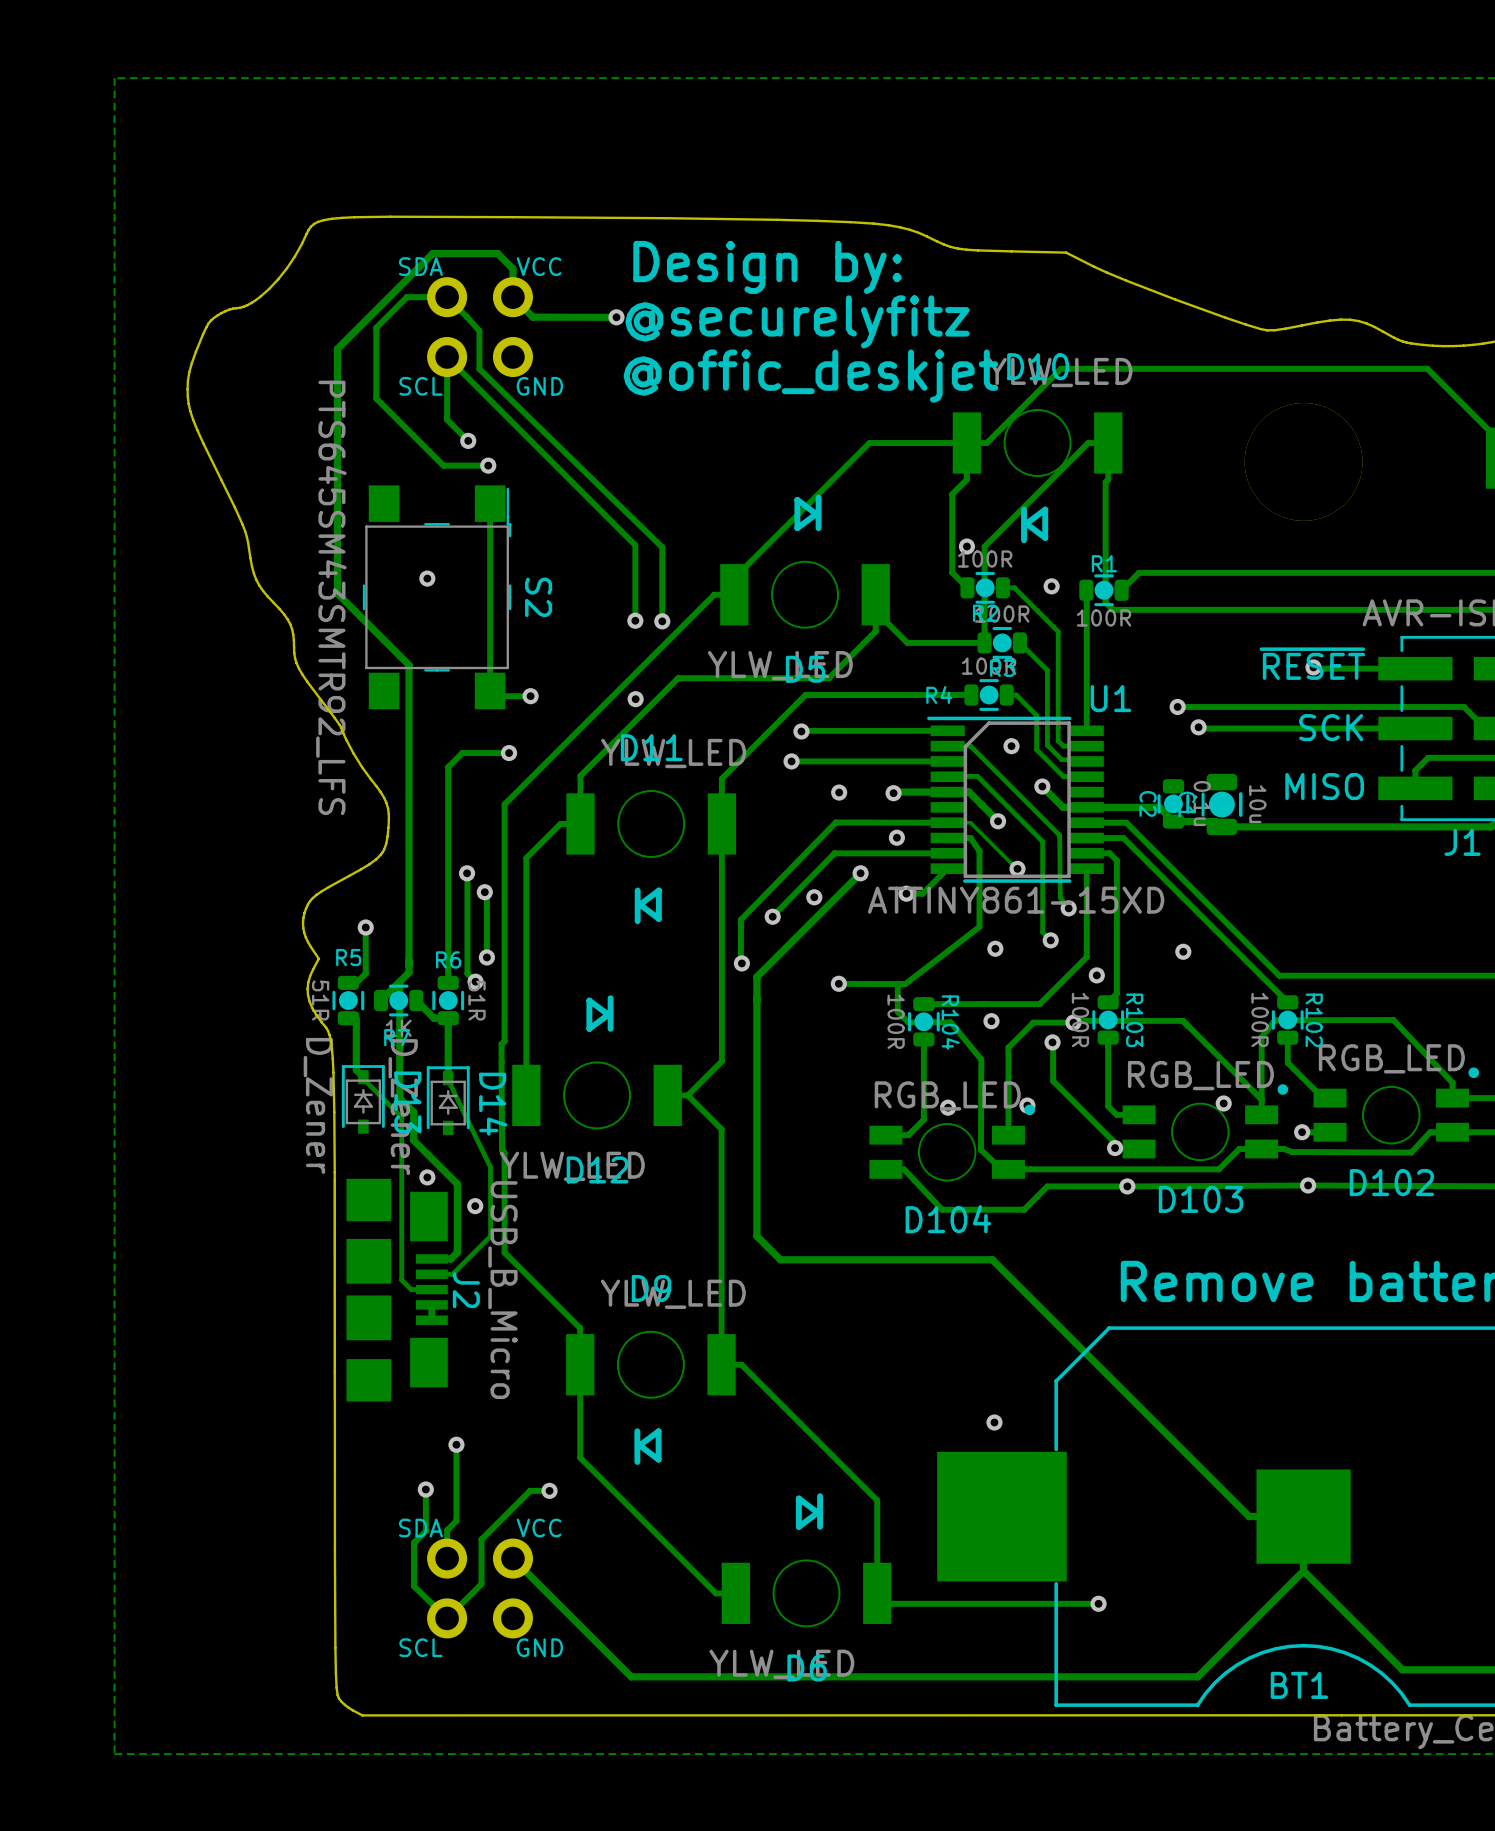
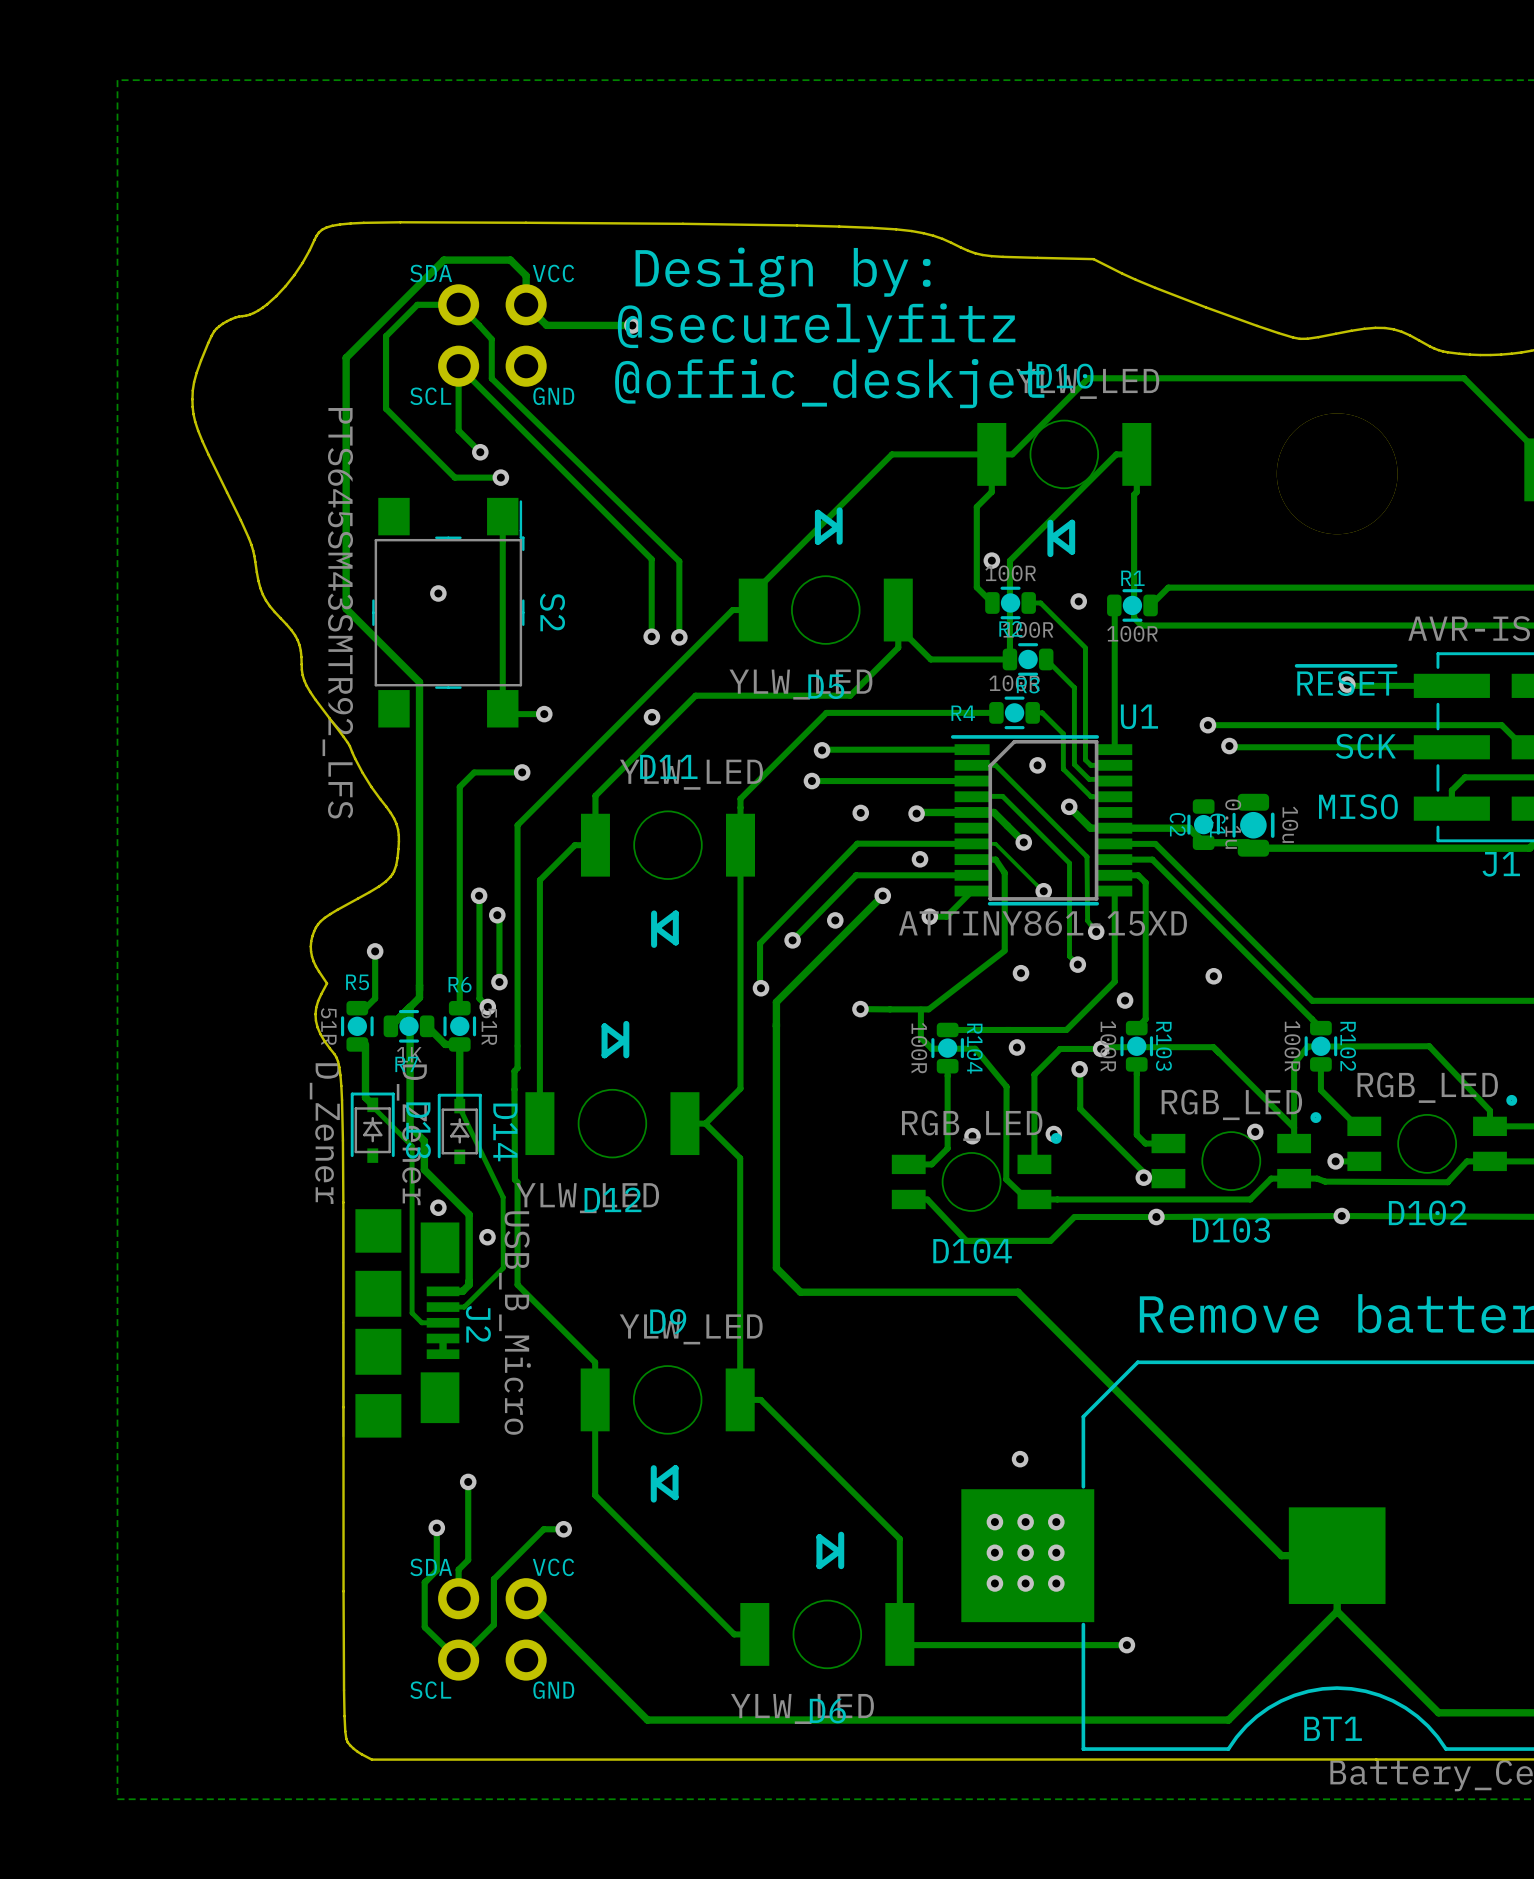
via: none -> (994, 1522)
via: none -> (1025, 1522)
via: none -> (1056, 1522)
via: none -> (994, 1552)
via: none -> (1025, 1552)
via: none -> (1056, 1552)
via: none -> (994, 1583)
via: none -> (1025, 1583)
via: none -> (1056, 1583)

